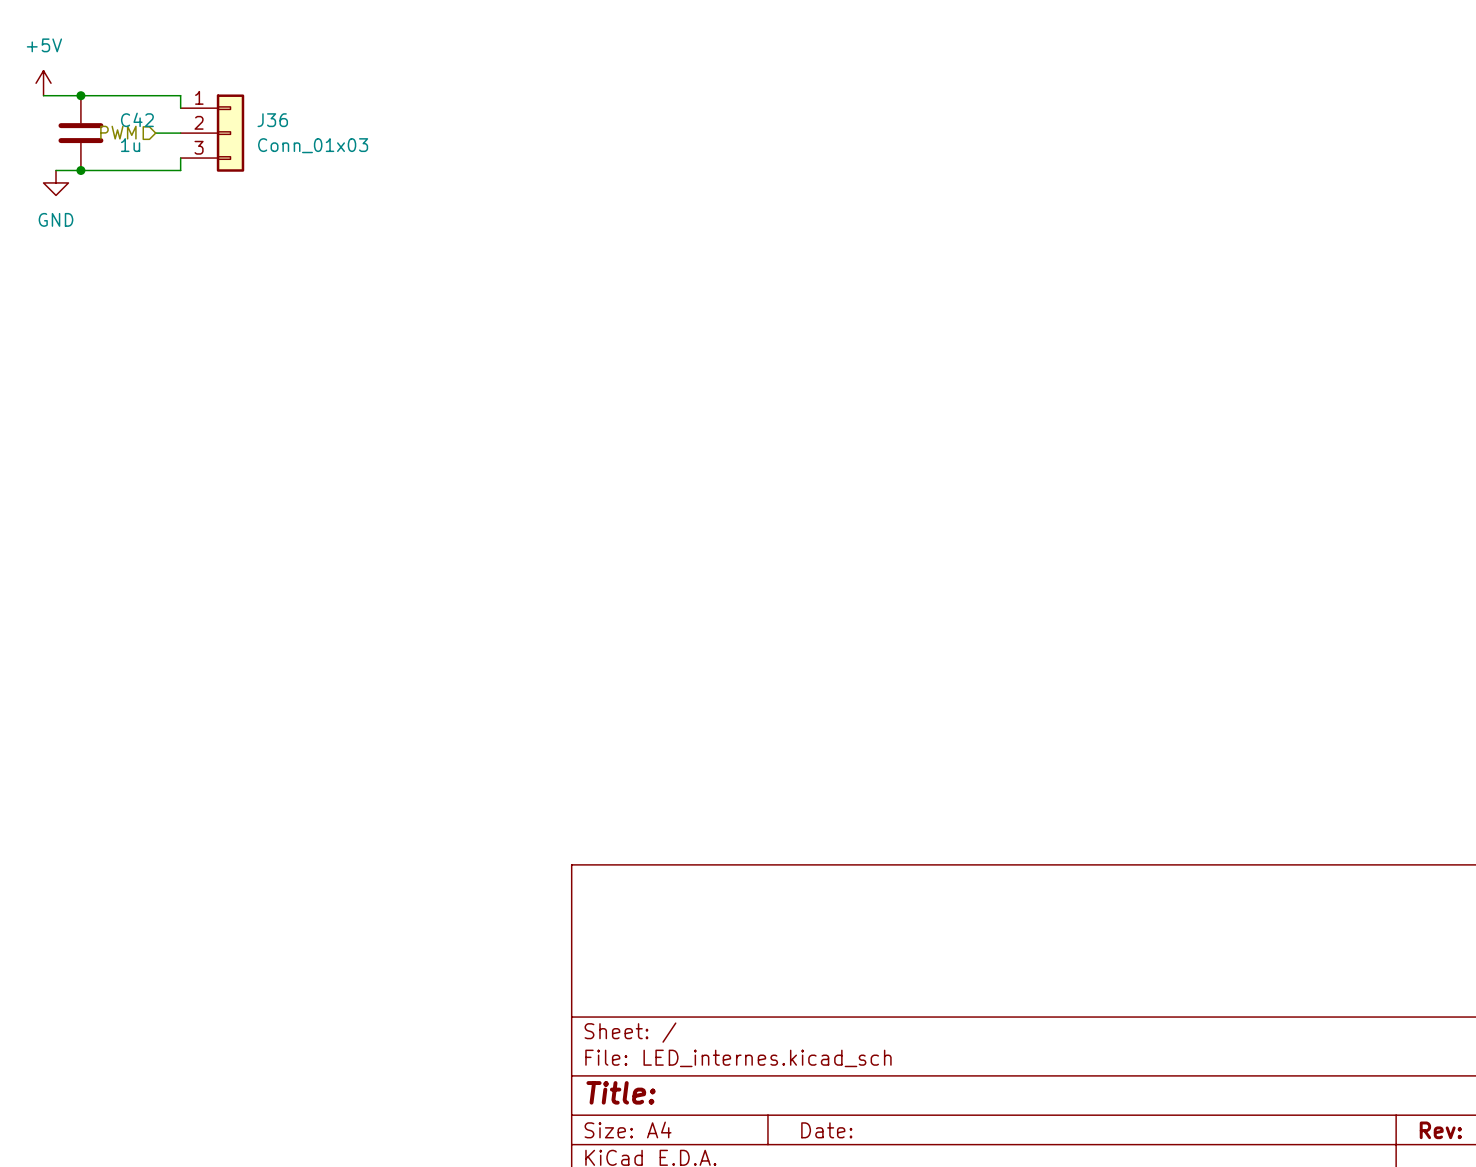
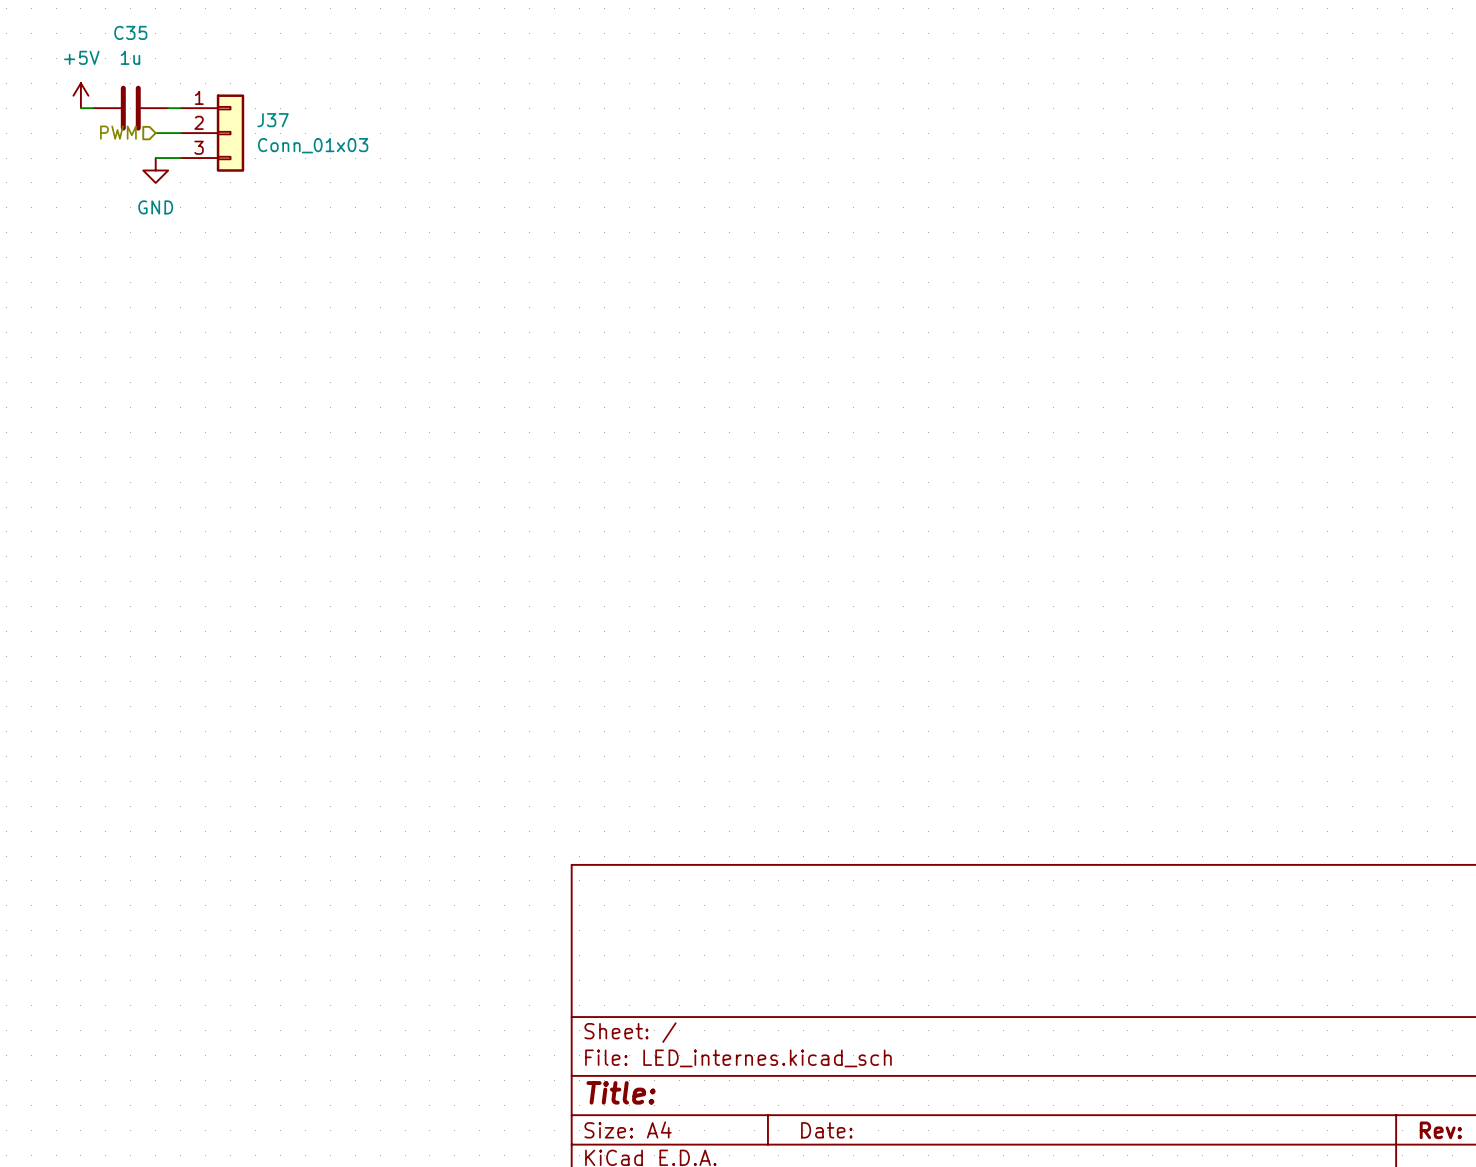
power symbol position: +5V (43, 83) -> +5V (80, 95)
wire: (43, 95) (180, 95) (180, 108) -> (168, 108) (180, 108)
junction: (80, 95) -> none
wire: none -> (80, 108) (93, 108)
C35: none -> 1u (130, 108)
J36 name: J36 (272, 120) -> J37 (273, 120)
C42: 1u (80, 133) -> none
wire: (180, 158) (180, 170) (56, 170) -> (180, 158) (155, 158)
junction: (80, 170) -> none
power symbol position: GND (56, 182) -> GND (155, 170)

